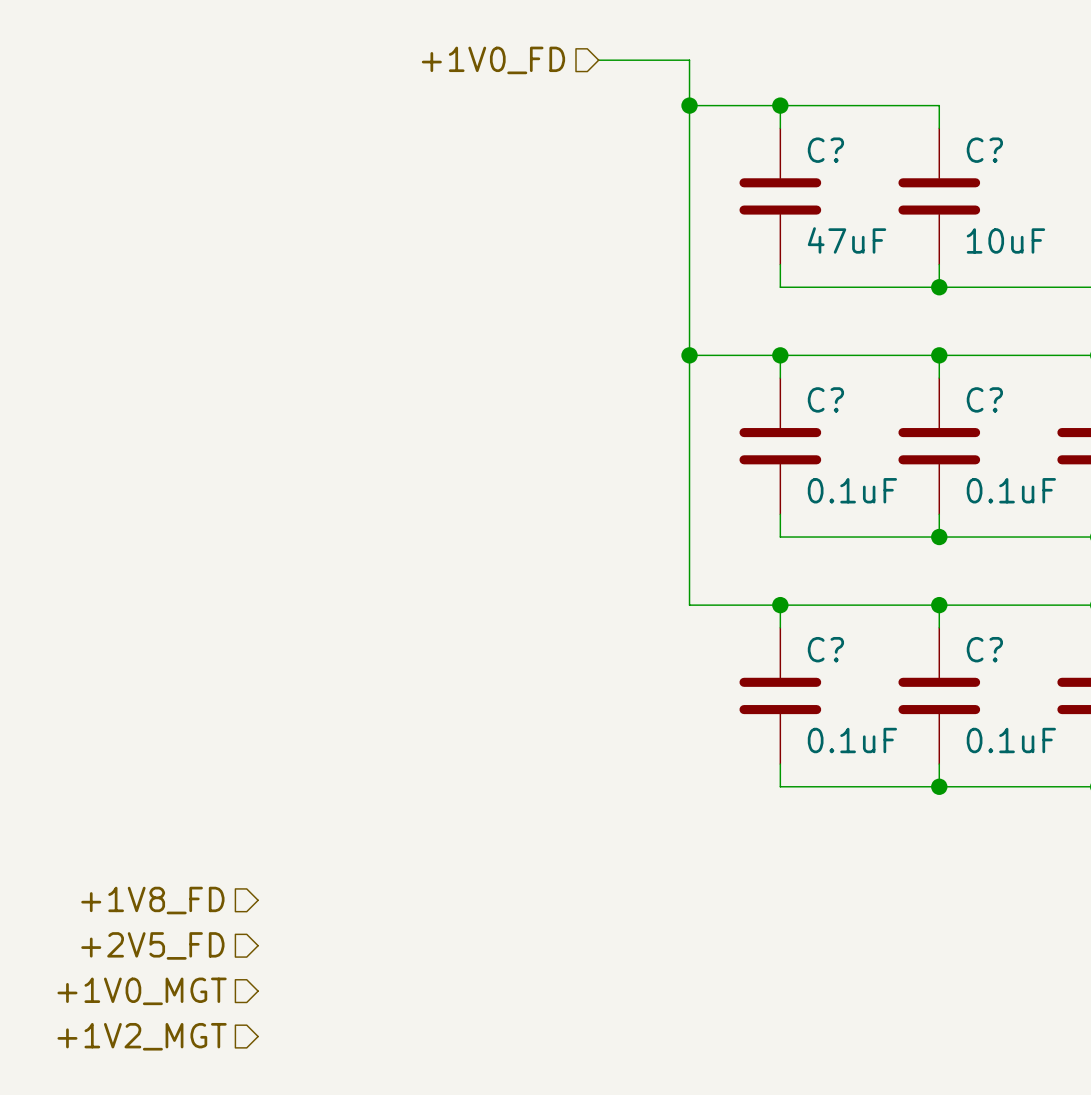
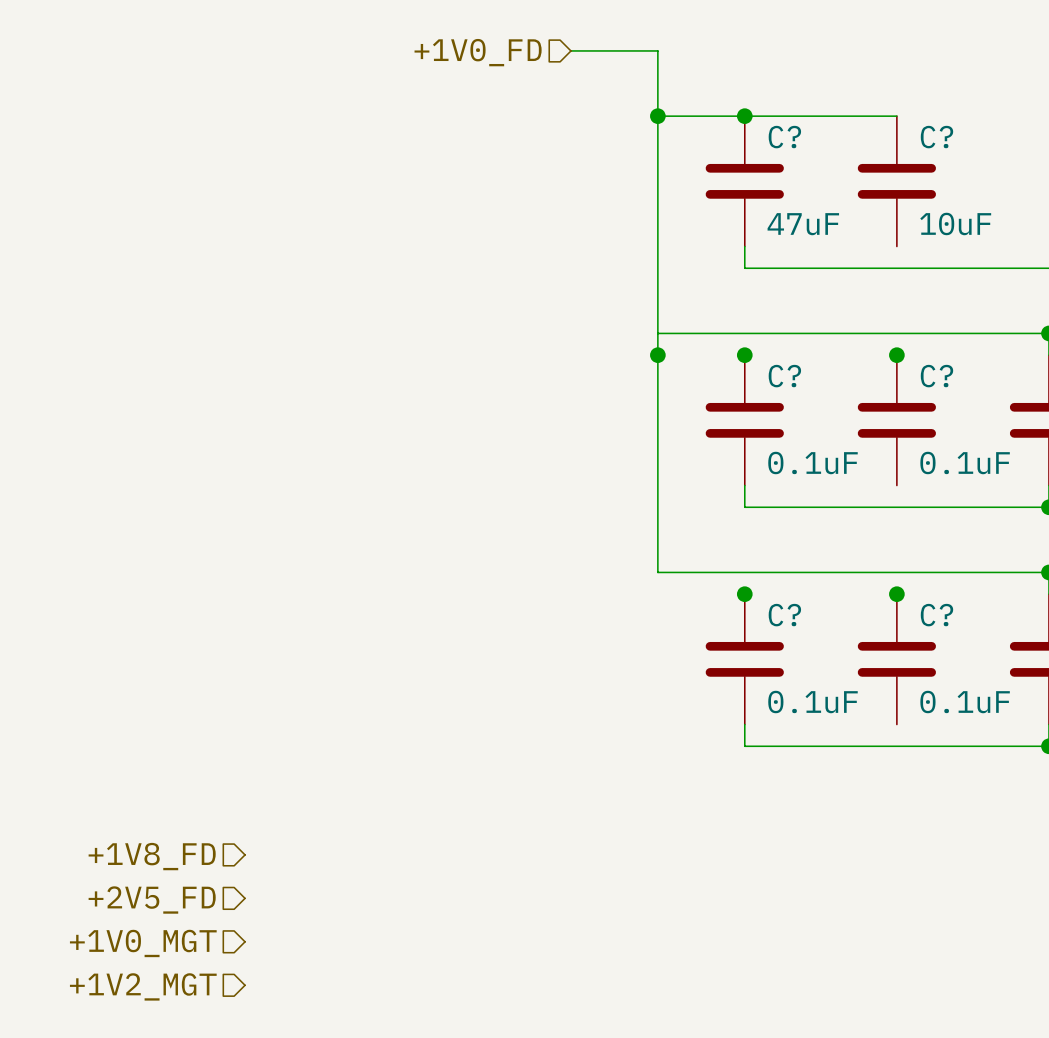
wire: (689, 105) (939, 105) (939, 128) -> (657, 116) (896, 116)
junction position: (689, 105) -> (657, 116)
wire: (780, 105) (780, 128) -> none
junction position: (780, 105) -> (744, 116)
wire: (939, 264) (939, 287) -> none
junction: (939, 287) -> none
junction position: (689, 355) -> (657, 355)
wire: (780, 355) (780, 378) -> none
junction position: (780, 355) -> (744, 355)
wire: (939, 355) (939, 378) -> none
junction position: (939, 355) -> (896, 355)
wire: (939, 514) (939, 537) -> none
junction: (939, 537) -> none
wire: (780, 605) (780, 627) -> none
junction position: (780, 605) -> (744, 594)
wire: (939, 605) (939, 627) -> none
junction position: (939, 605) -> (896, 594)
wire: (939, 764) (939, 786) -> none
junction: (939, 786) -> none

